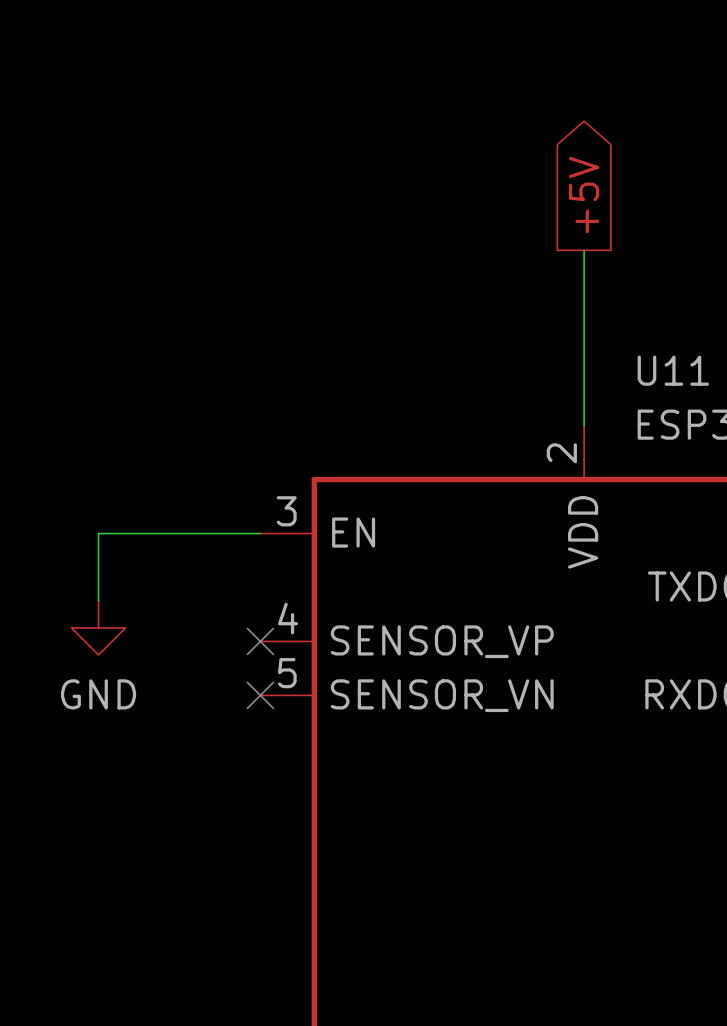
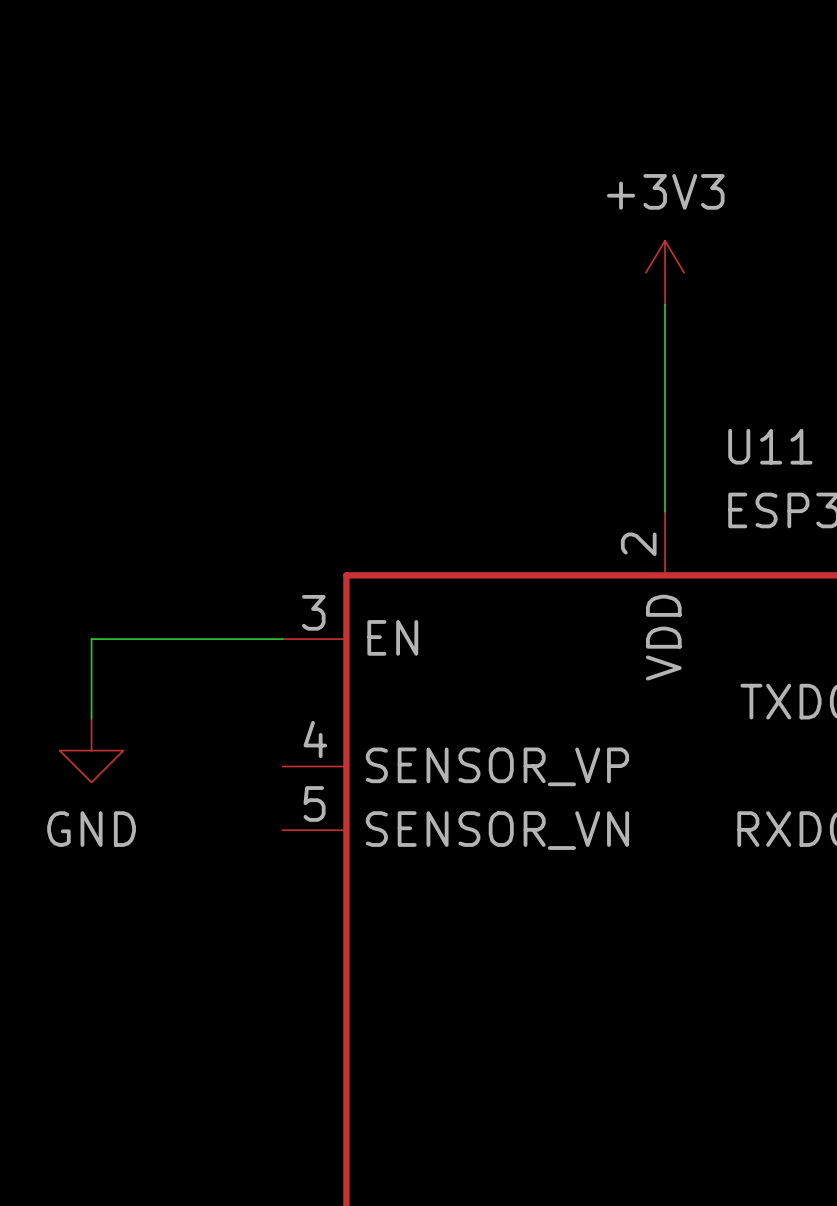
global label: +5V (584, 195) -> none
power symbol: none -> +3V3 (665, 272)
no-connect mark: (260, 641) -> none
no-connect mark: (260, 695) -> none

